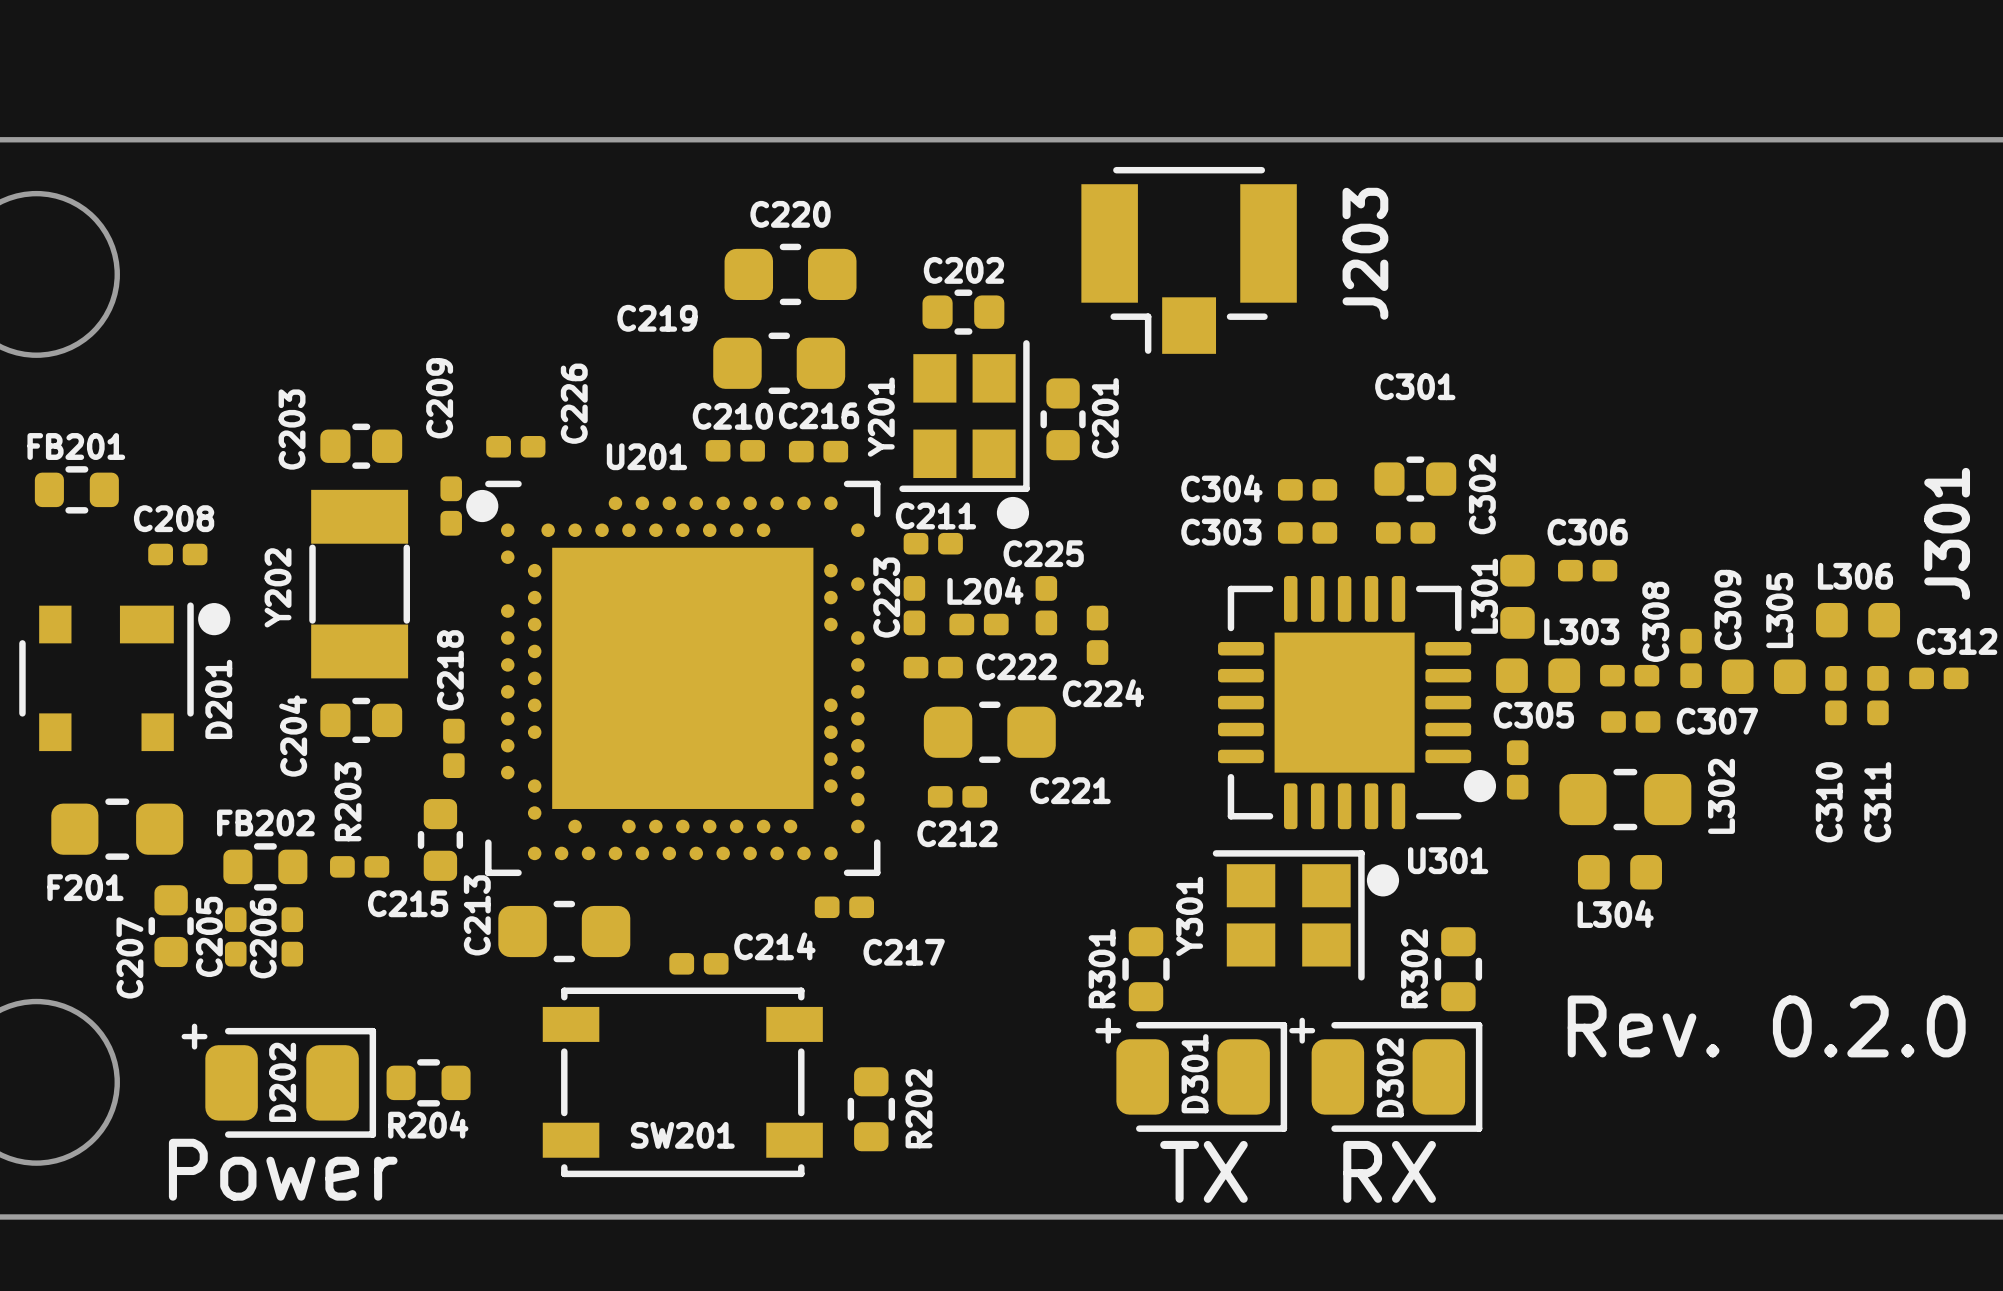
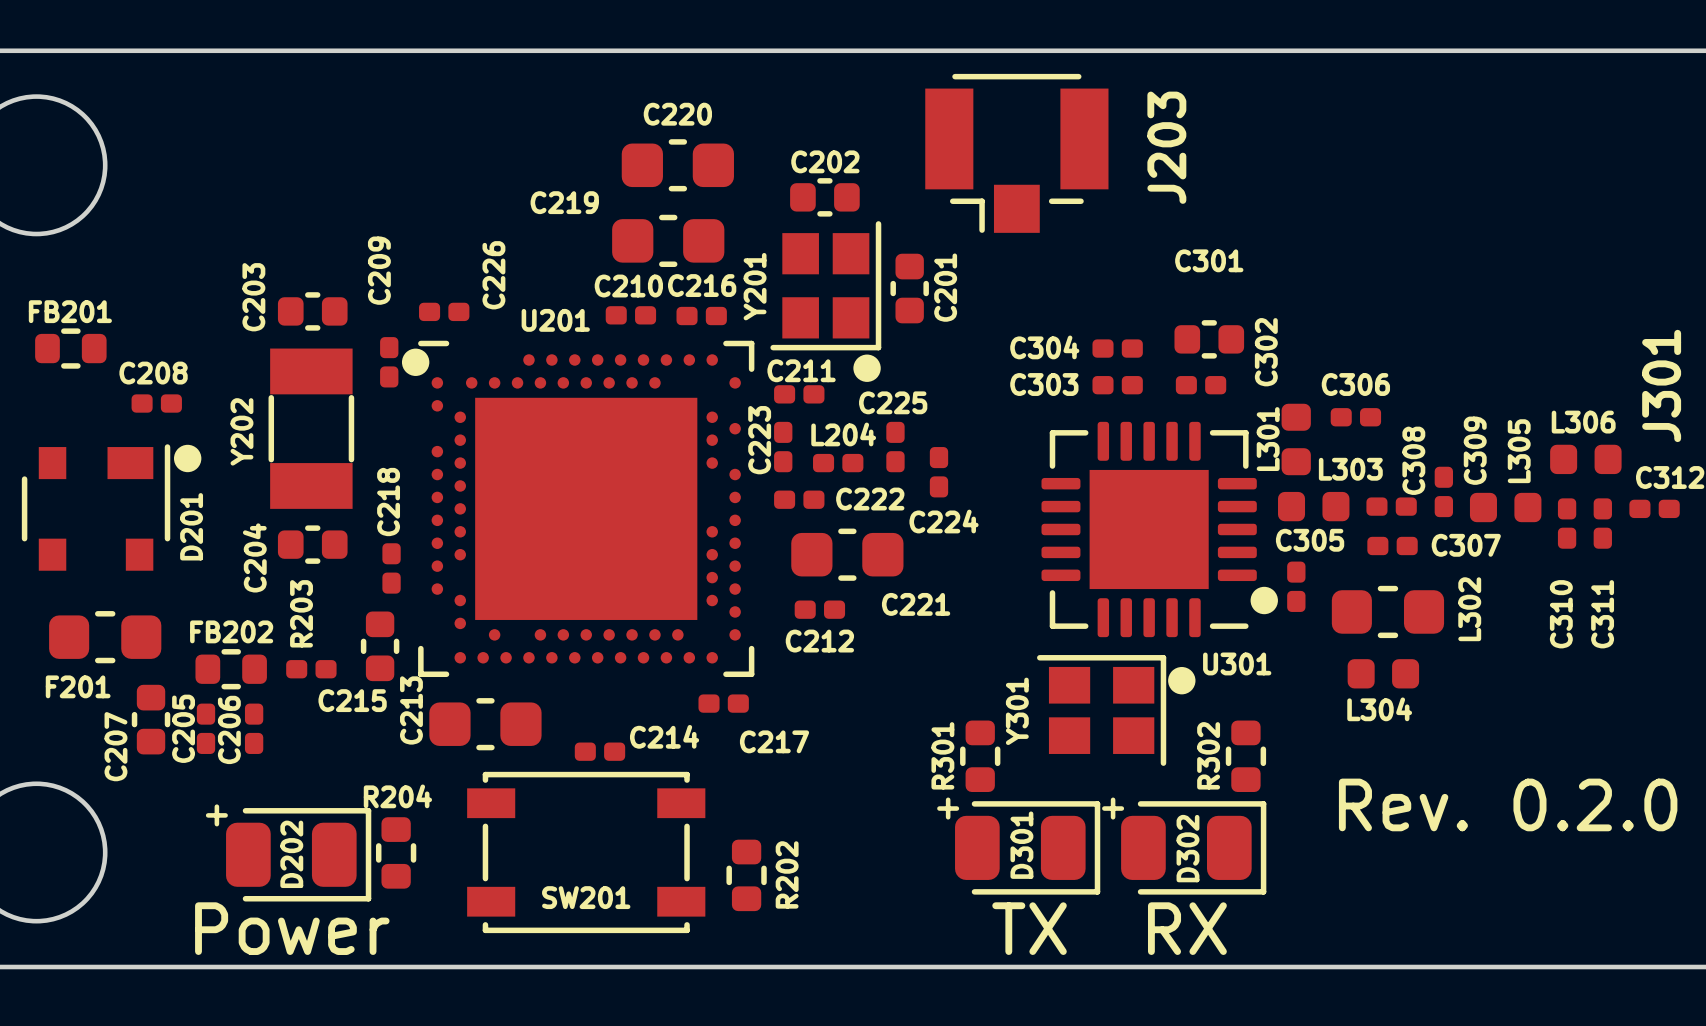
text position: + (194, 1036) -> + (216, 815)
D202 position: (290, 1082) -> (298, 854)
R204 rotation: 0° (428, 1082) -> 90° clockwise (396, 852)
text position: Power (283, 1169) -> Power (292, 928)

